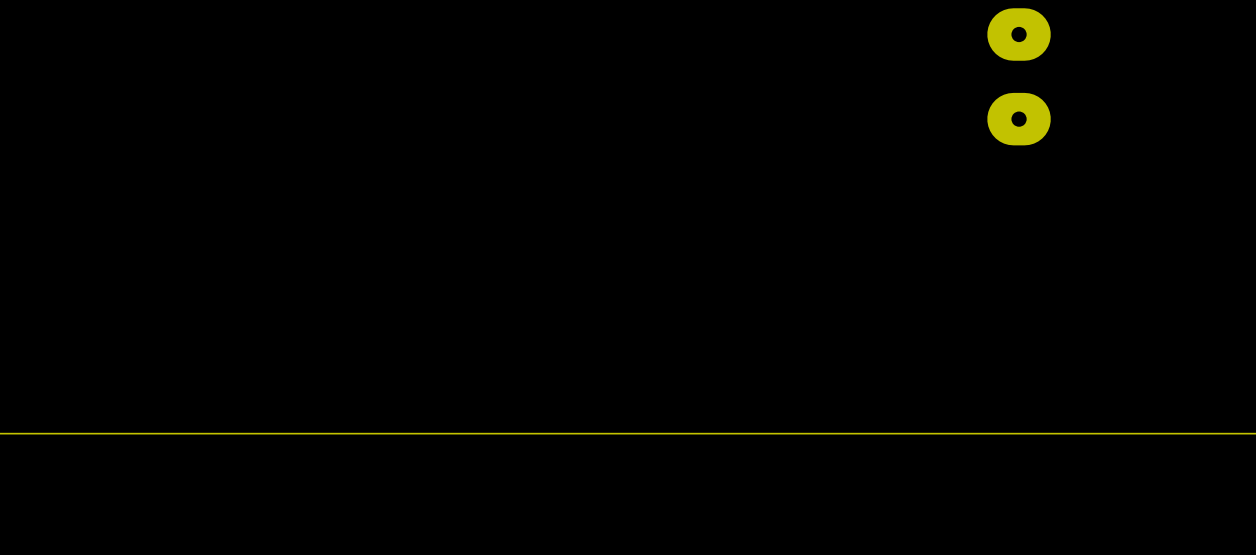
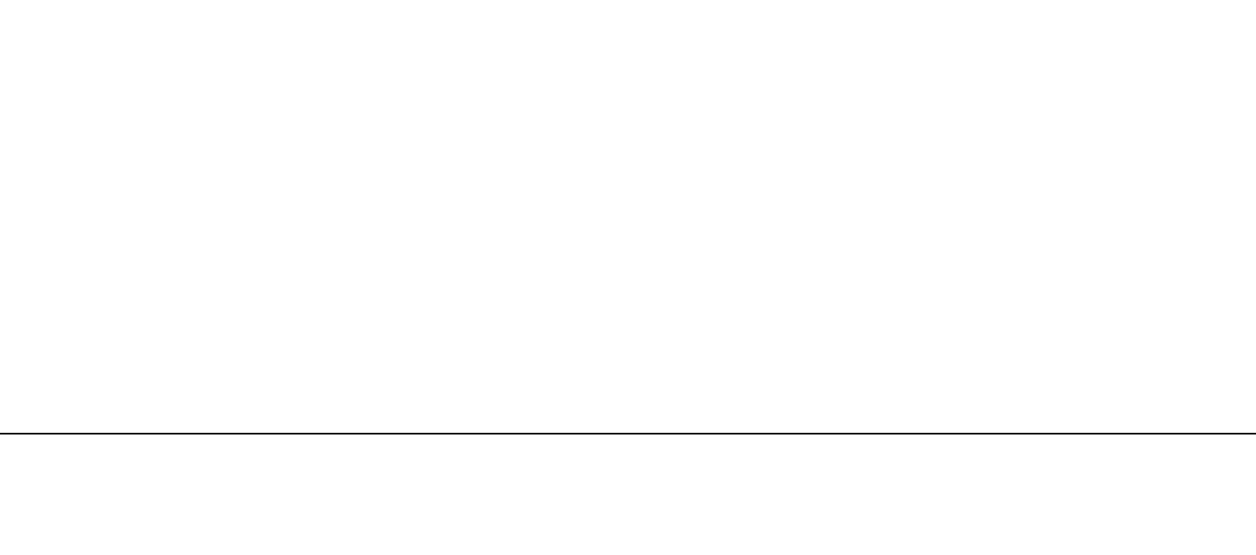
part: (1019, 76) -> none

